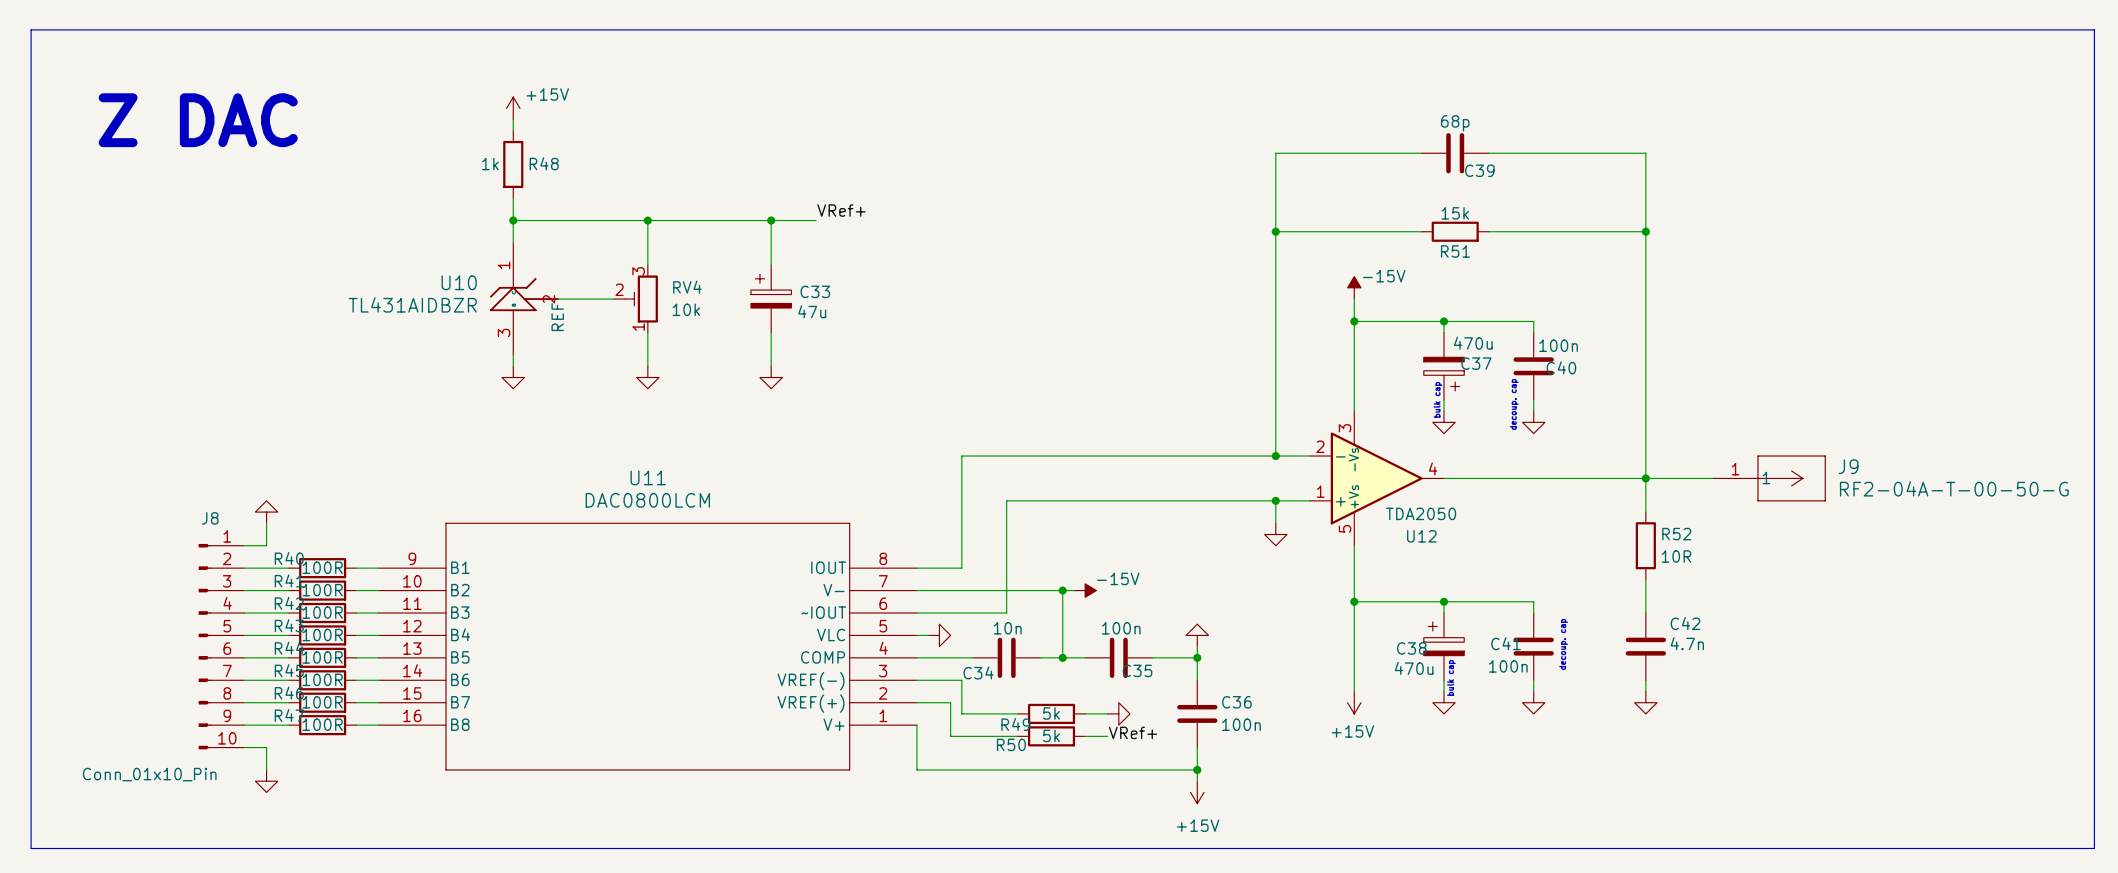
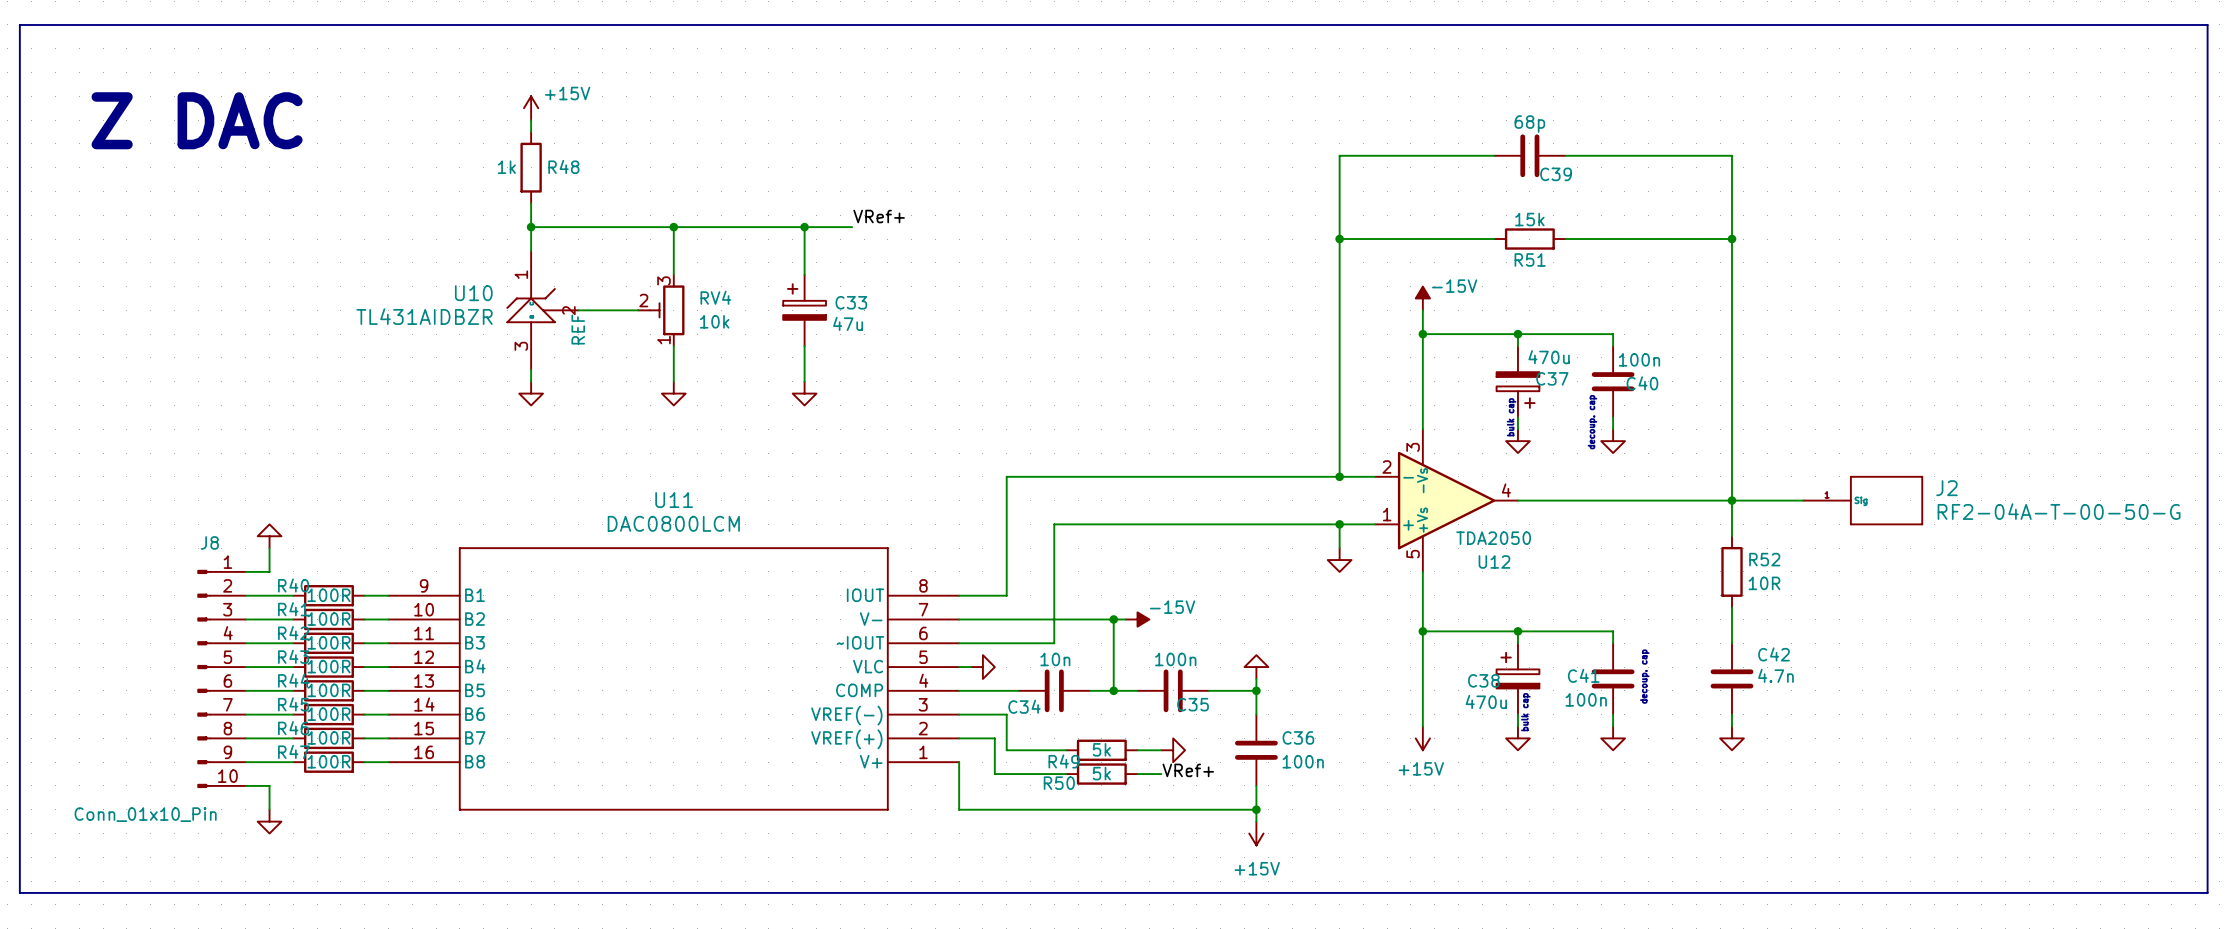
J9: RF2-04A-T-00-50-G (1769, 478) -> none
J2: none -> RF2-04A-T-00-50-G (1863, 500)

